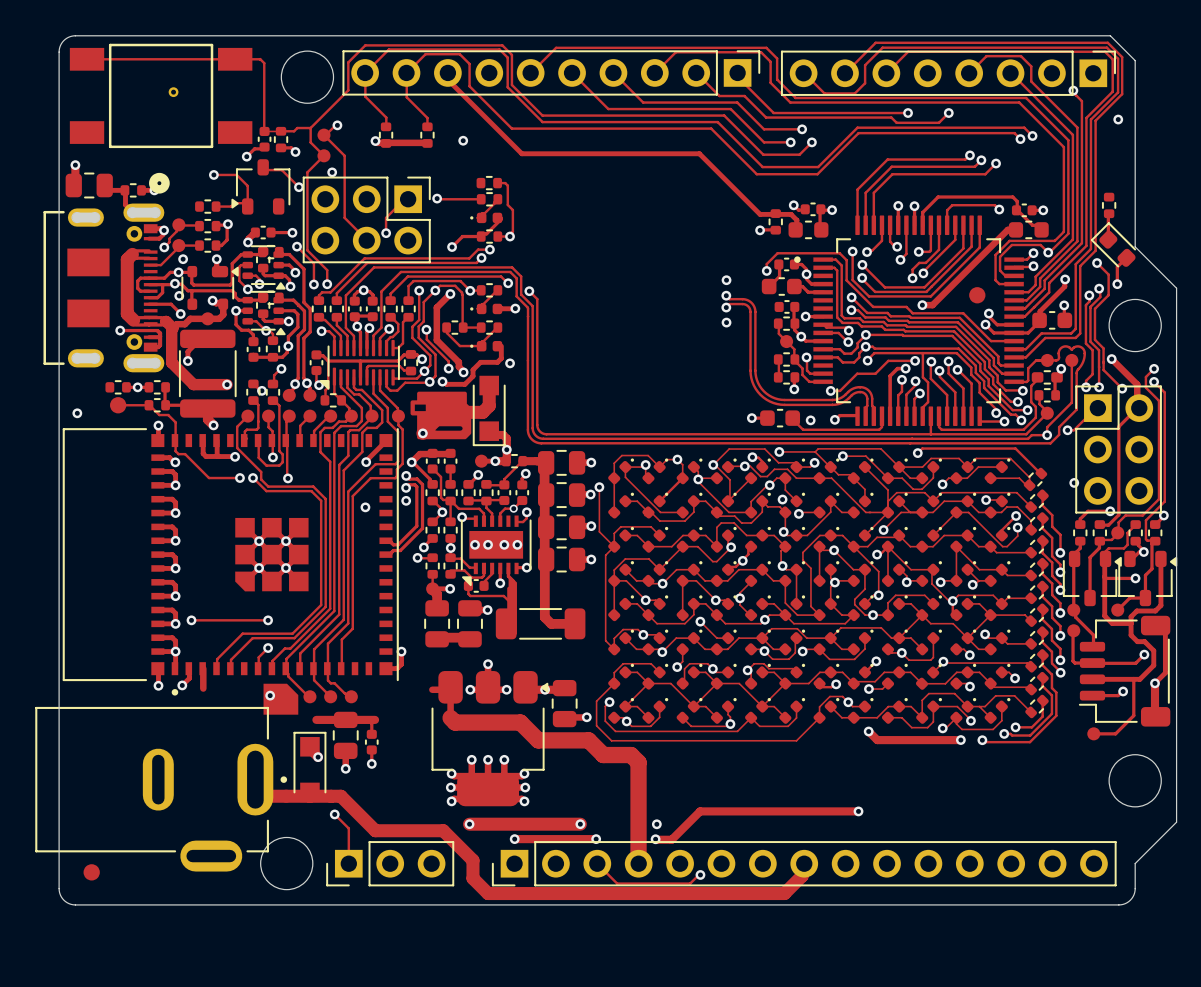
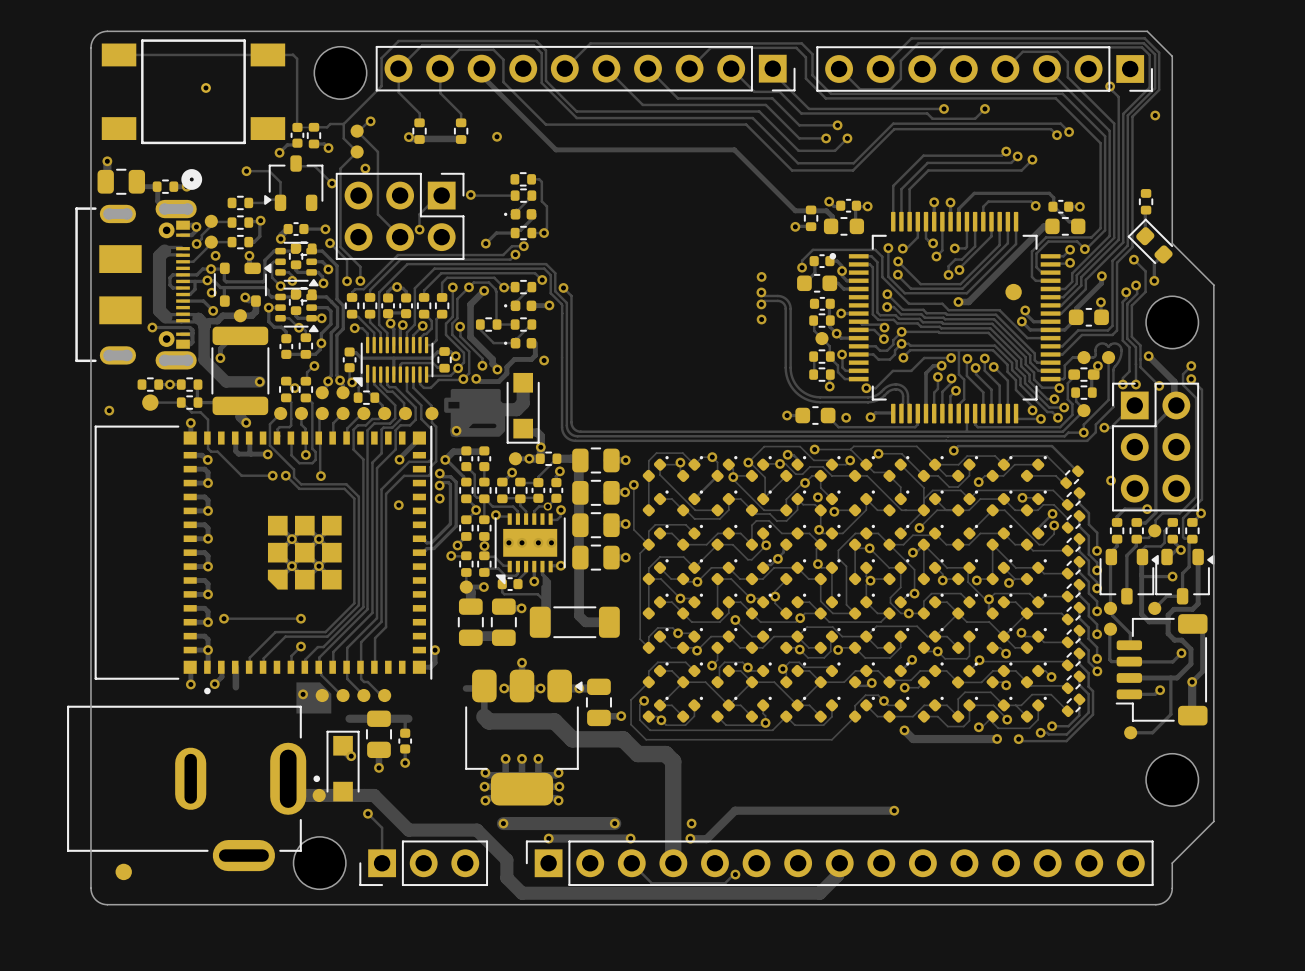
part footprint: [342, 50, 761, 96] -> [375, 45, 796, 92]
part footprint: [780, 50, 1116, 96] -> [816, 46, 1153, 92]
part footprint: [491, 841, 1117, 887] -> [525, 840, 1154, 887]

